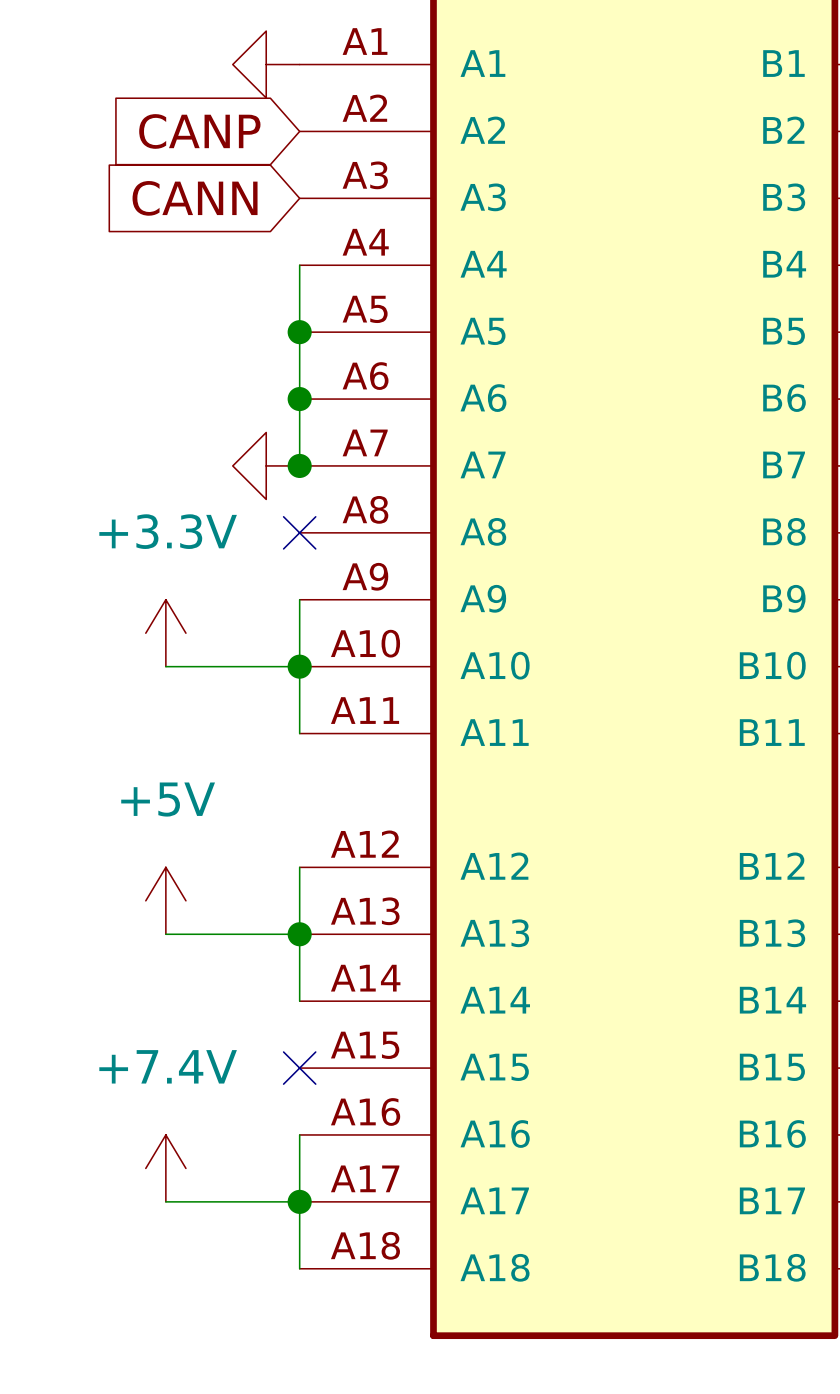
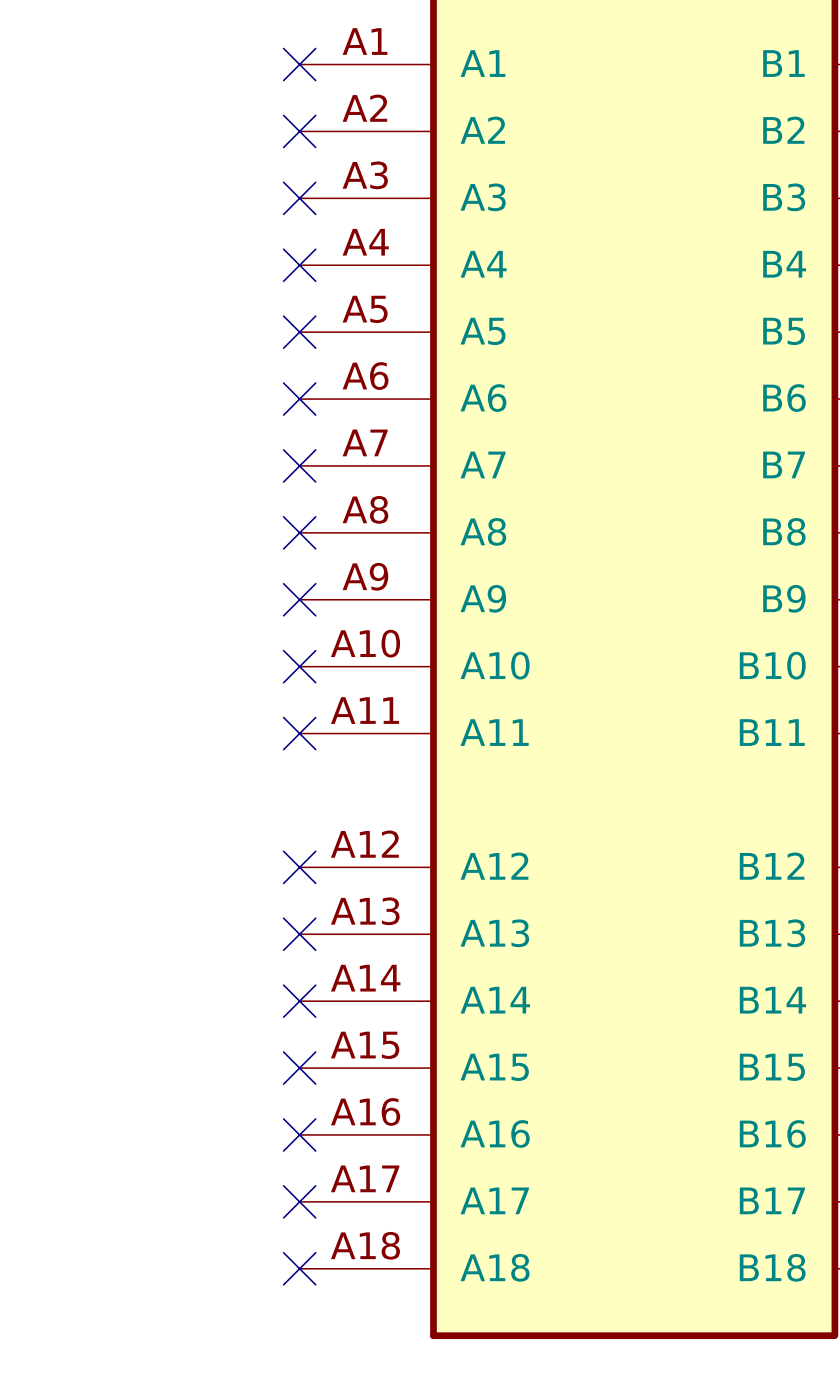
power symbol: (266, 64) -> none
no-connect mark: none -> (299, 64)
global label: CANP (199, 131) -> none
no-connect mark: none -> (299, 131)
global label: CANN (195, 198) -> none
no-connect mark: none -> (299, 198)
wire: (299, 265) (299, 465) -> none
no-connect mark: none -> (299, 265)
junction: (299, 332) -> none
no-connect mark: none -> (299, 332)
junction: (299, 399) -> none
no-connect mark: none -> (299, 399)
power symbol: (266, 465) -> none
junction: (299, 465) -> none
no-connect mark: none -> (299, 465)
wire: (299, 599) (299, 733) -> none
no-connect mark: none -> (299, 599)
power symbol: +3.3V (165, 633) -> none
wire: (165, 666) (299, 666) -> none
junction: (299, 666) -> none
no-connect mark: none -> (299, 666)
no-connect mark: none -> (299, 733)
wire: (299, 867) (299, 1001) -> none
no-connect mark: none -> (299, 867)
power symbol: +5V (165, 900) -> none
wire: (165, 934) (299, 934) -> none
junction: (299, 934) -> none
no-connect mark: none -> (299, 934)
no-connect mark: none -> (299, 1001)
wire: (299, 1134) (299, 1268) -> none
no-connect mark: none -> (299, 1134)
power symbol: +7.4V (165, 1168) -> none
wire: (165, 1201) (299, 1201) -> none
junction: (299, 1201) -> none
no-connect mark: none -> (299, 1201)
no-connect mark: none -> (299, 1268)

